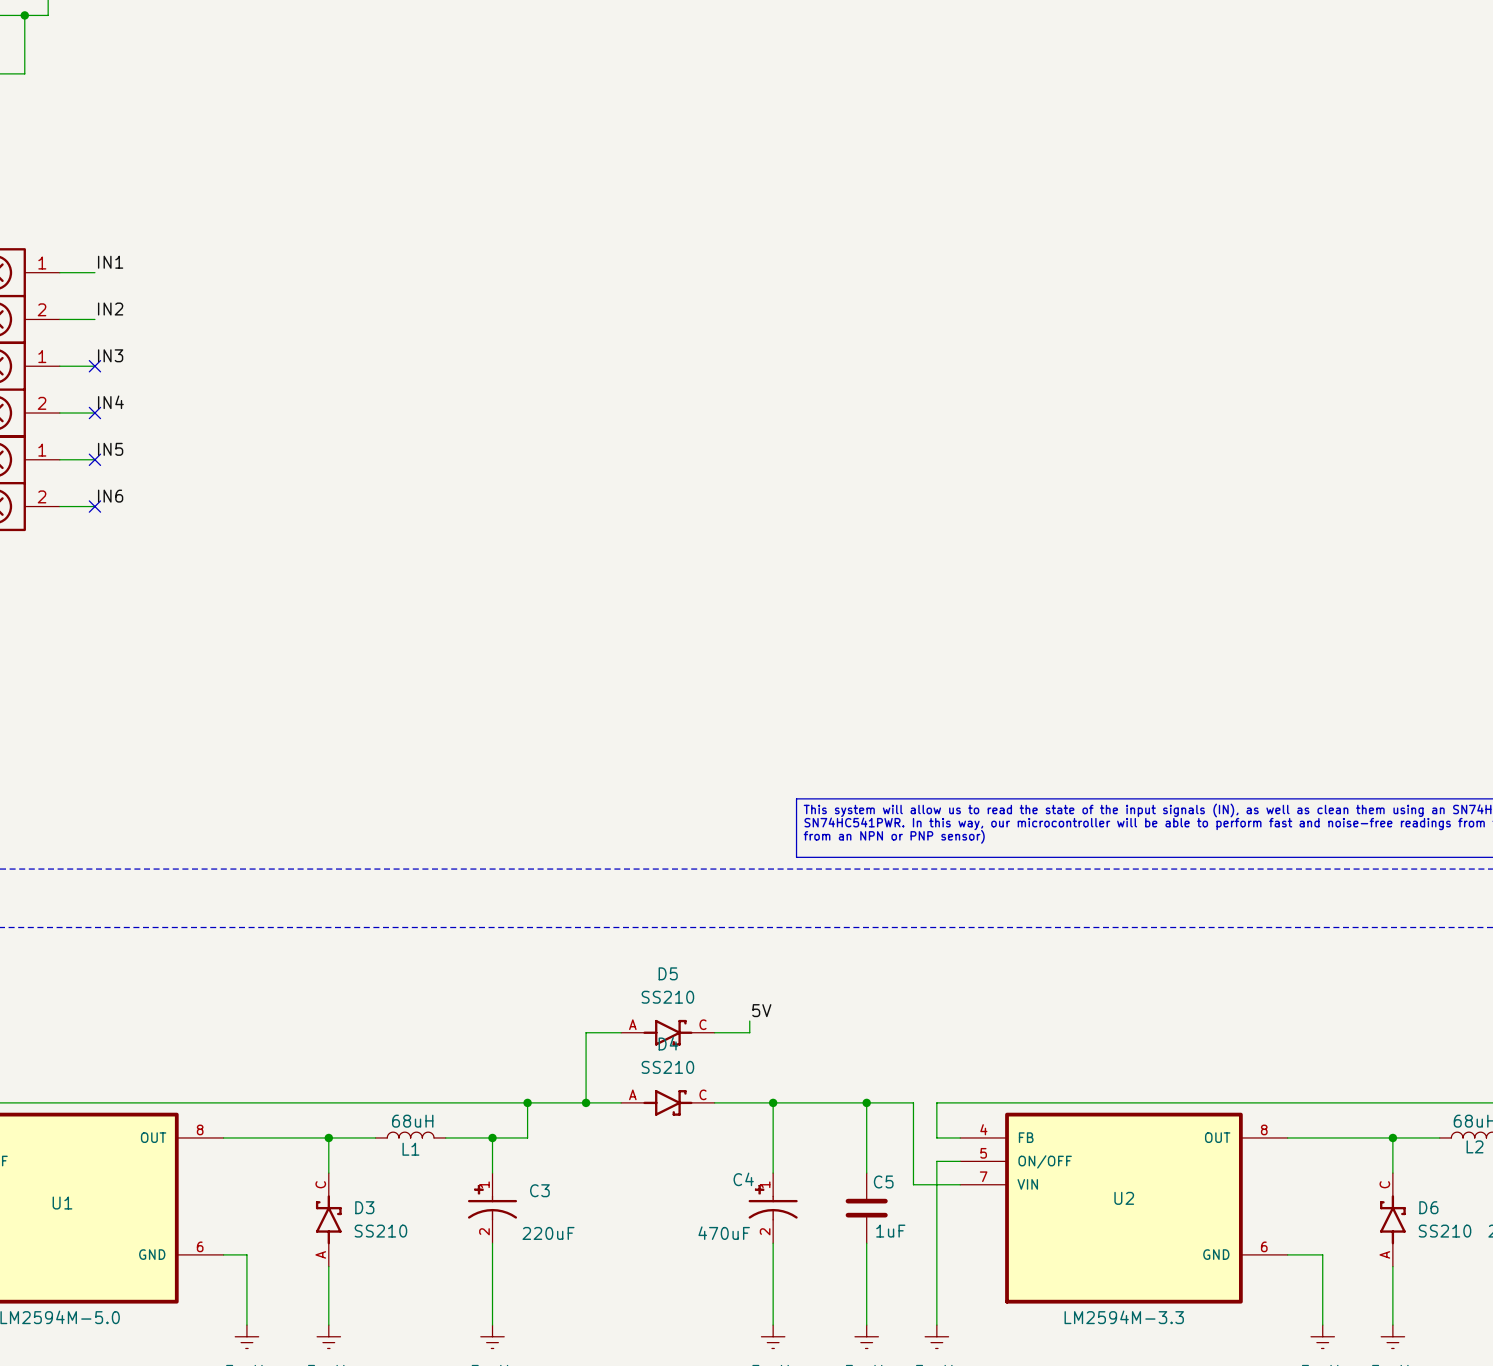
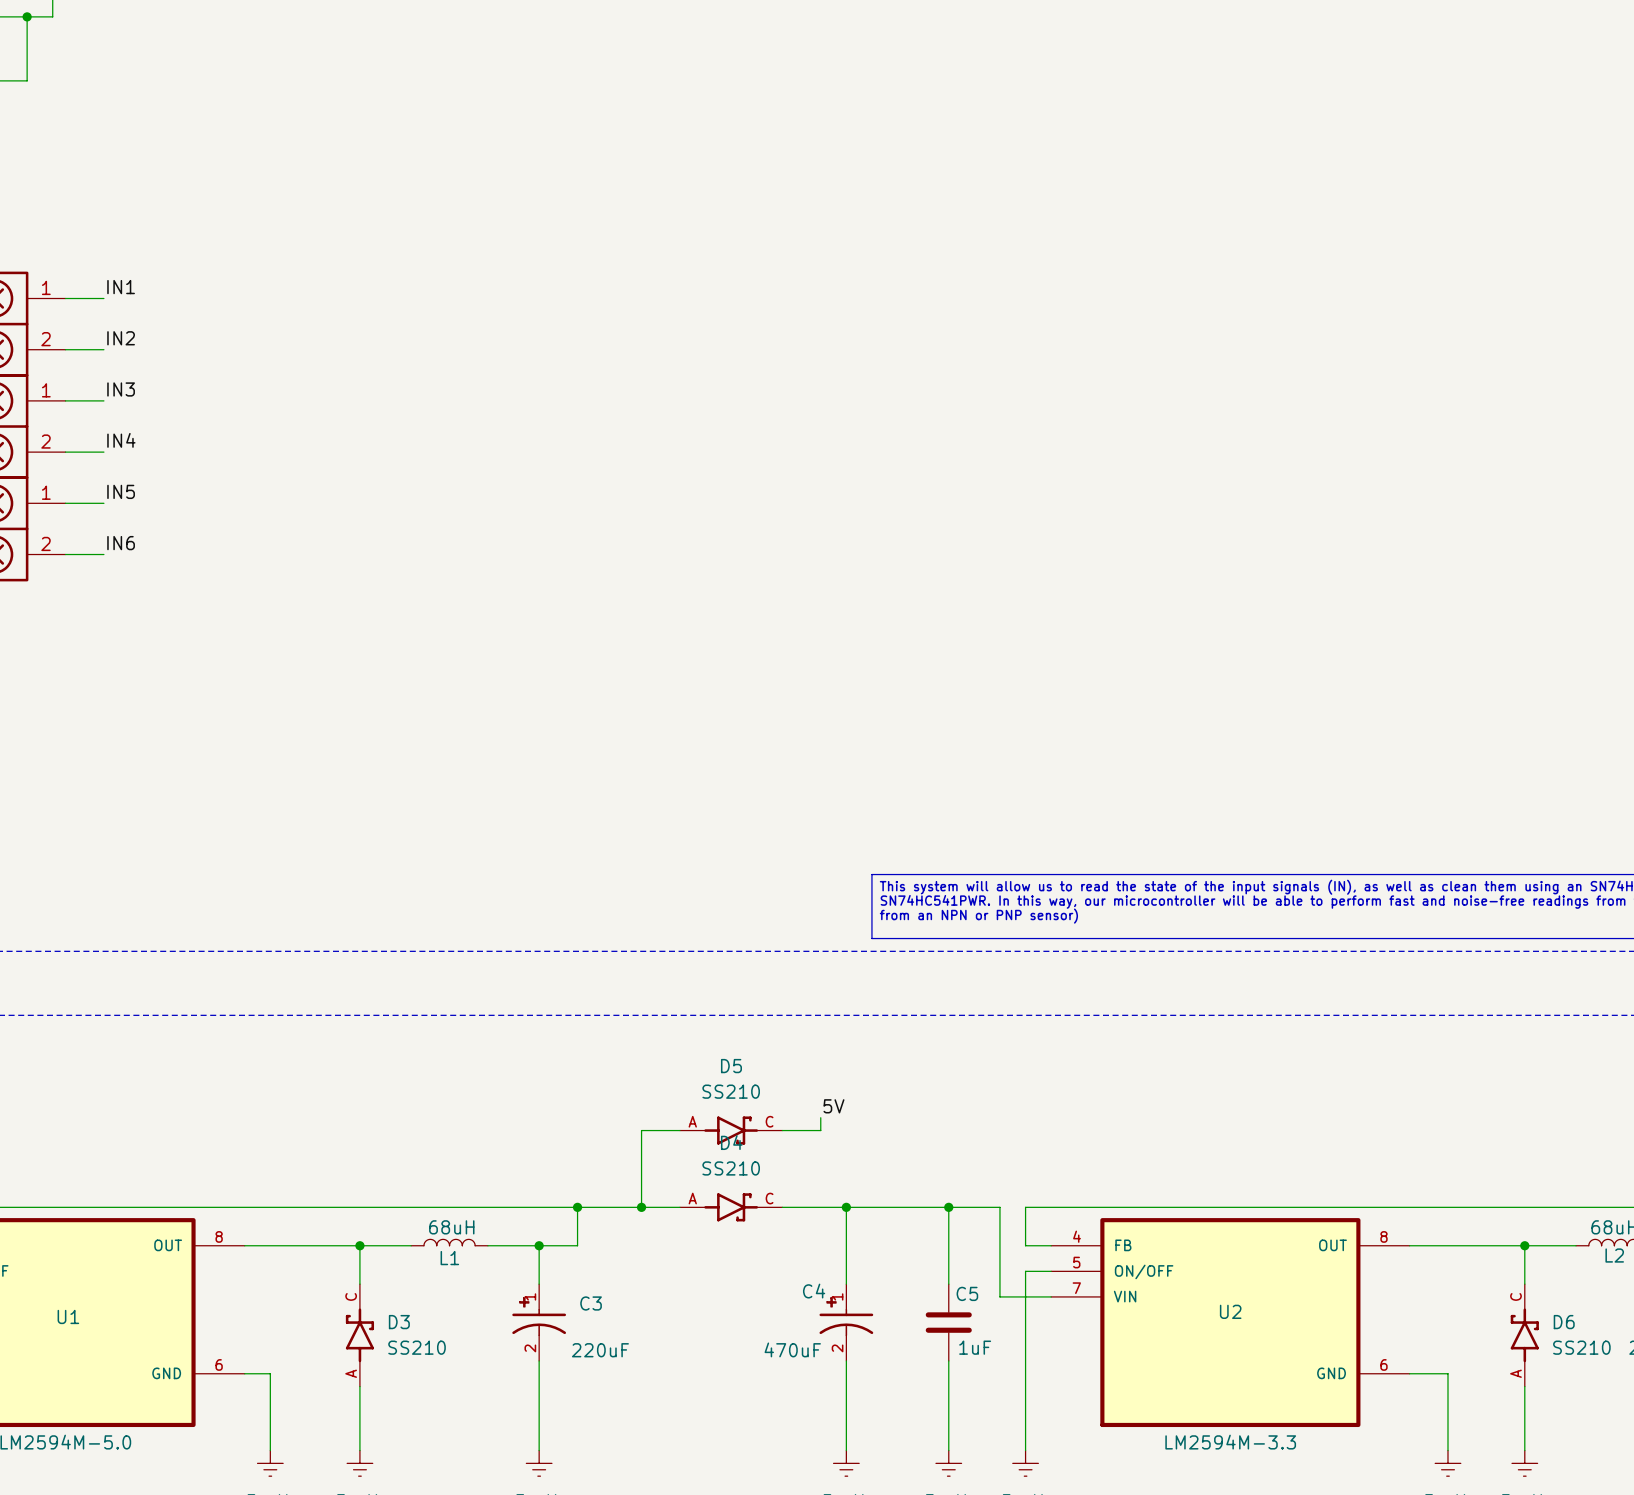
no-connect mark: (94, 366) -> none
no-connect mark: (94, 413) -> none
no-connect mark: (94, 459) -> none
no-connect mark: (94, 506) -> none

